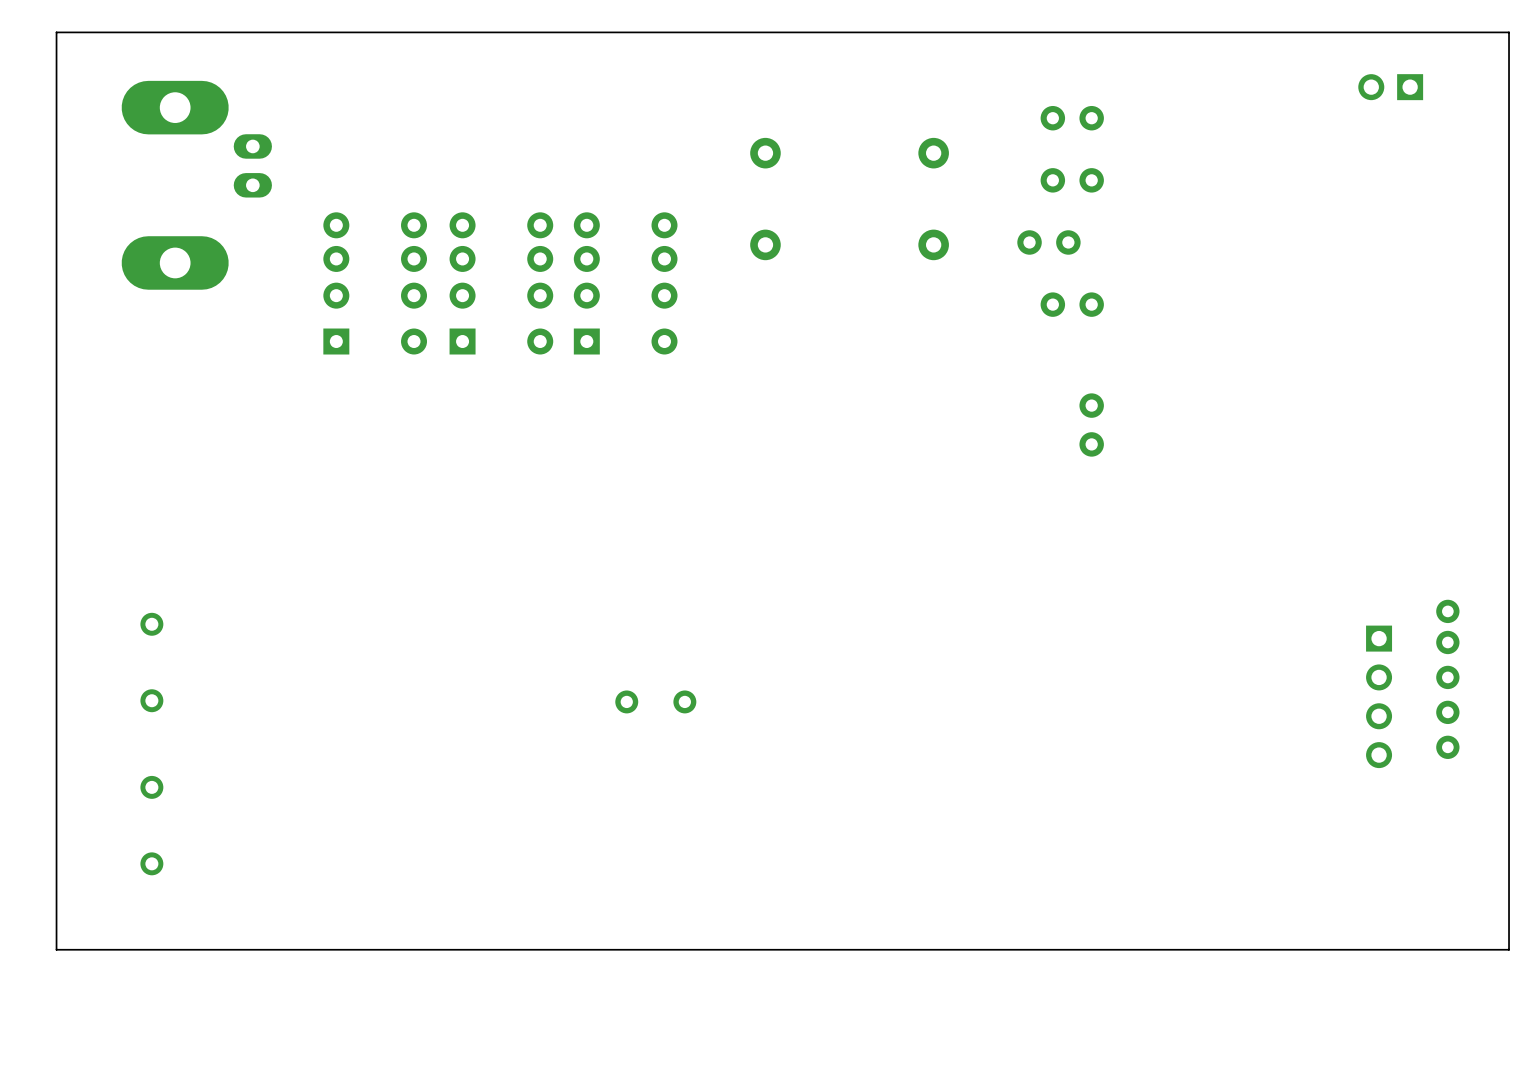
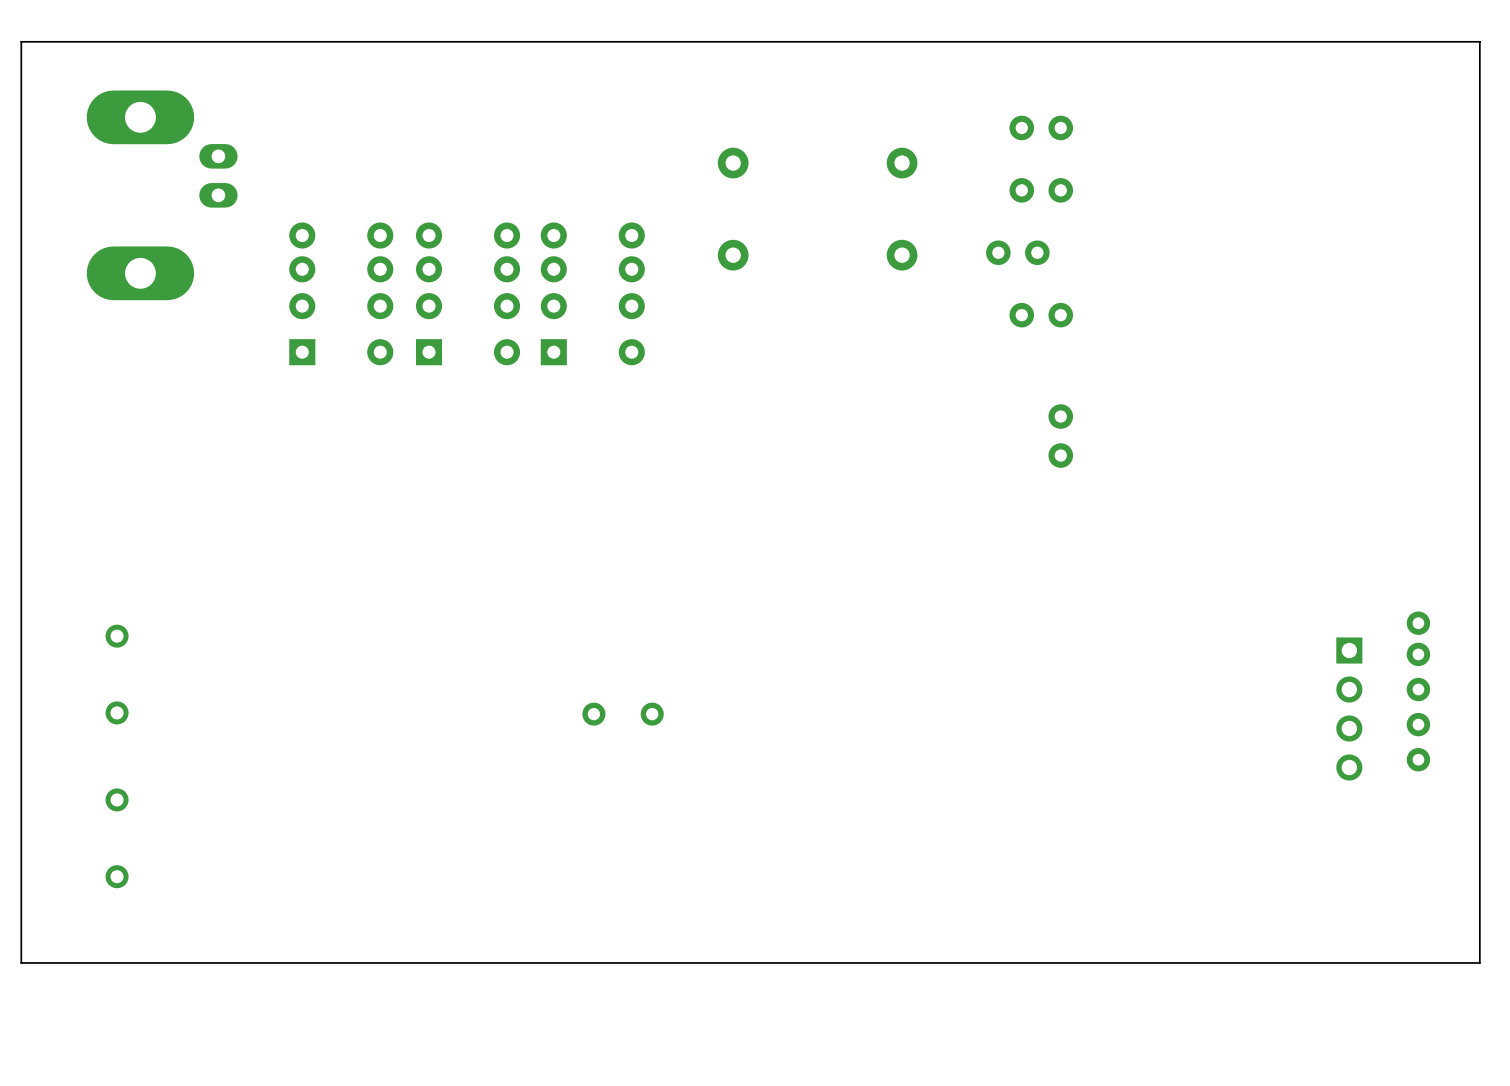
part: (1390, 87) -> none

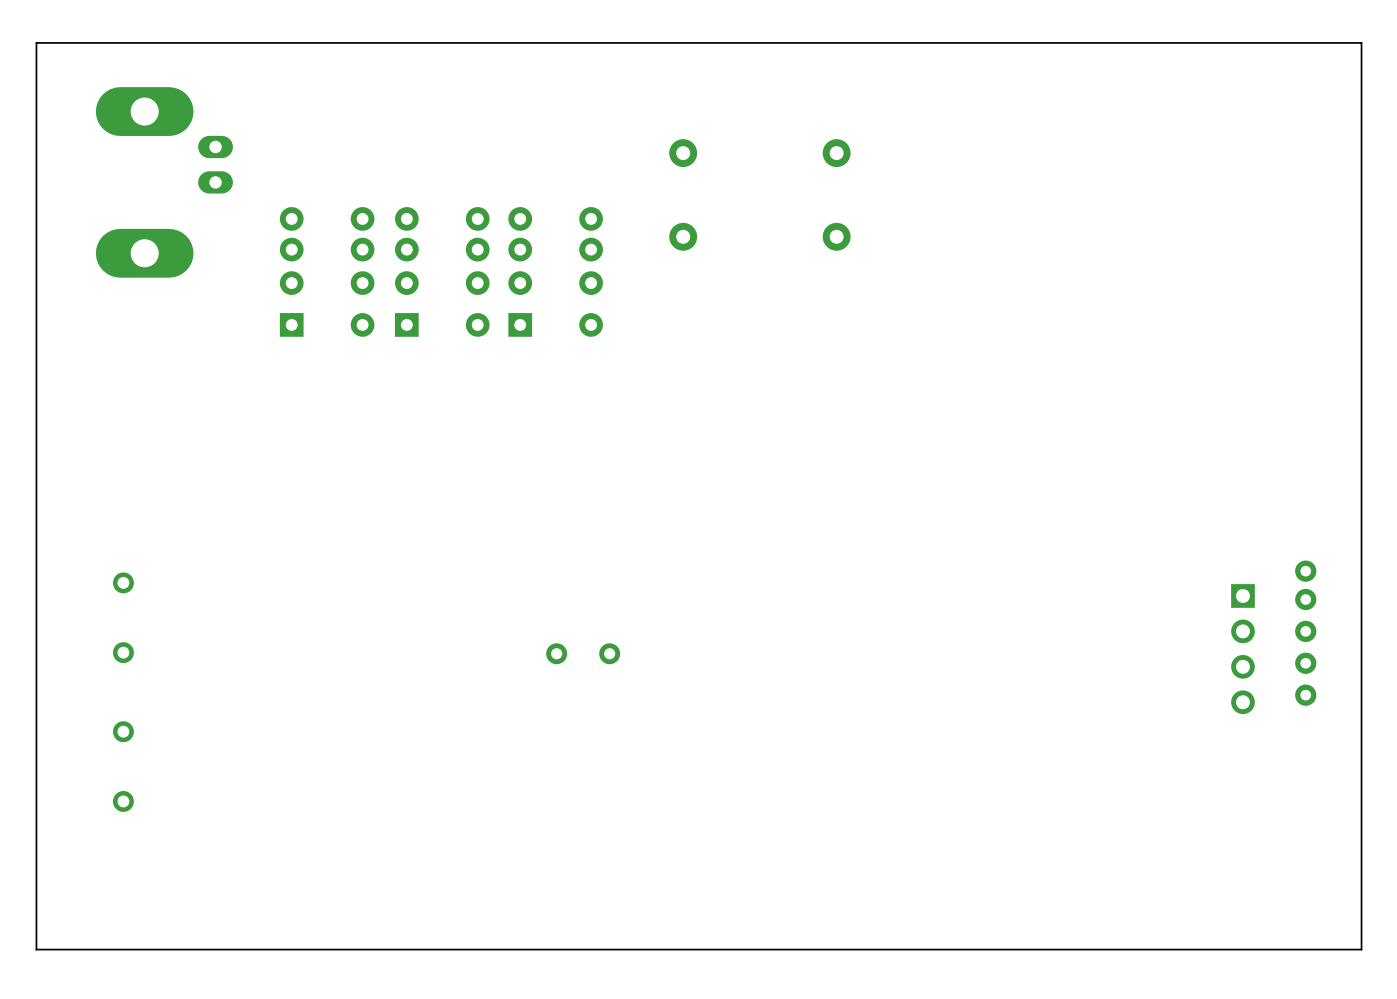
part: (1041, 127) -> none
part: (1041, 190) -> none
part: (1017, 252) -> none
part: (1041, 315) -> none
part: (1060, 436) -> none
board edge: (1479, 962) (21, 962) -> (1361, 879) (1361, 949) (36, 949) (36, 879)

